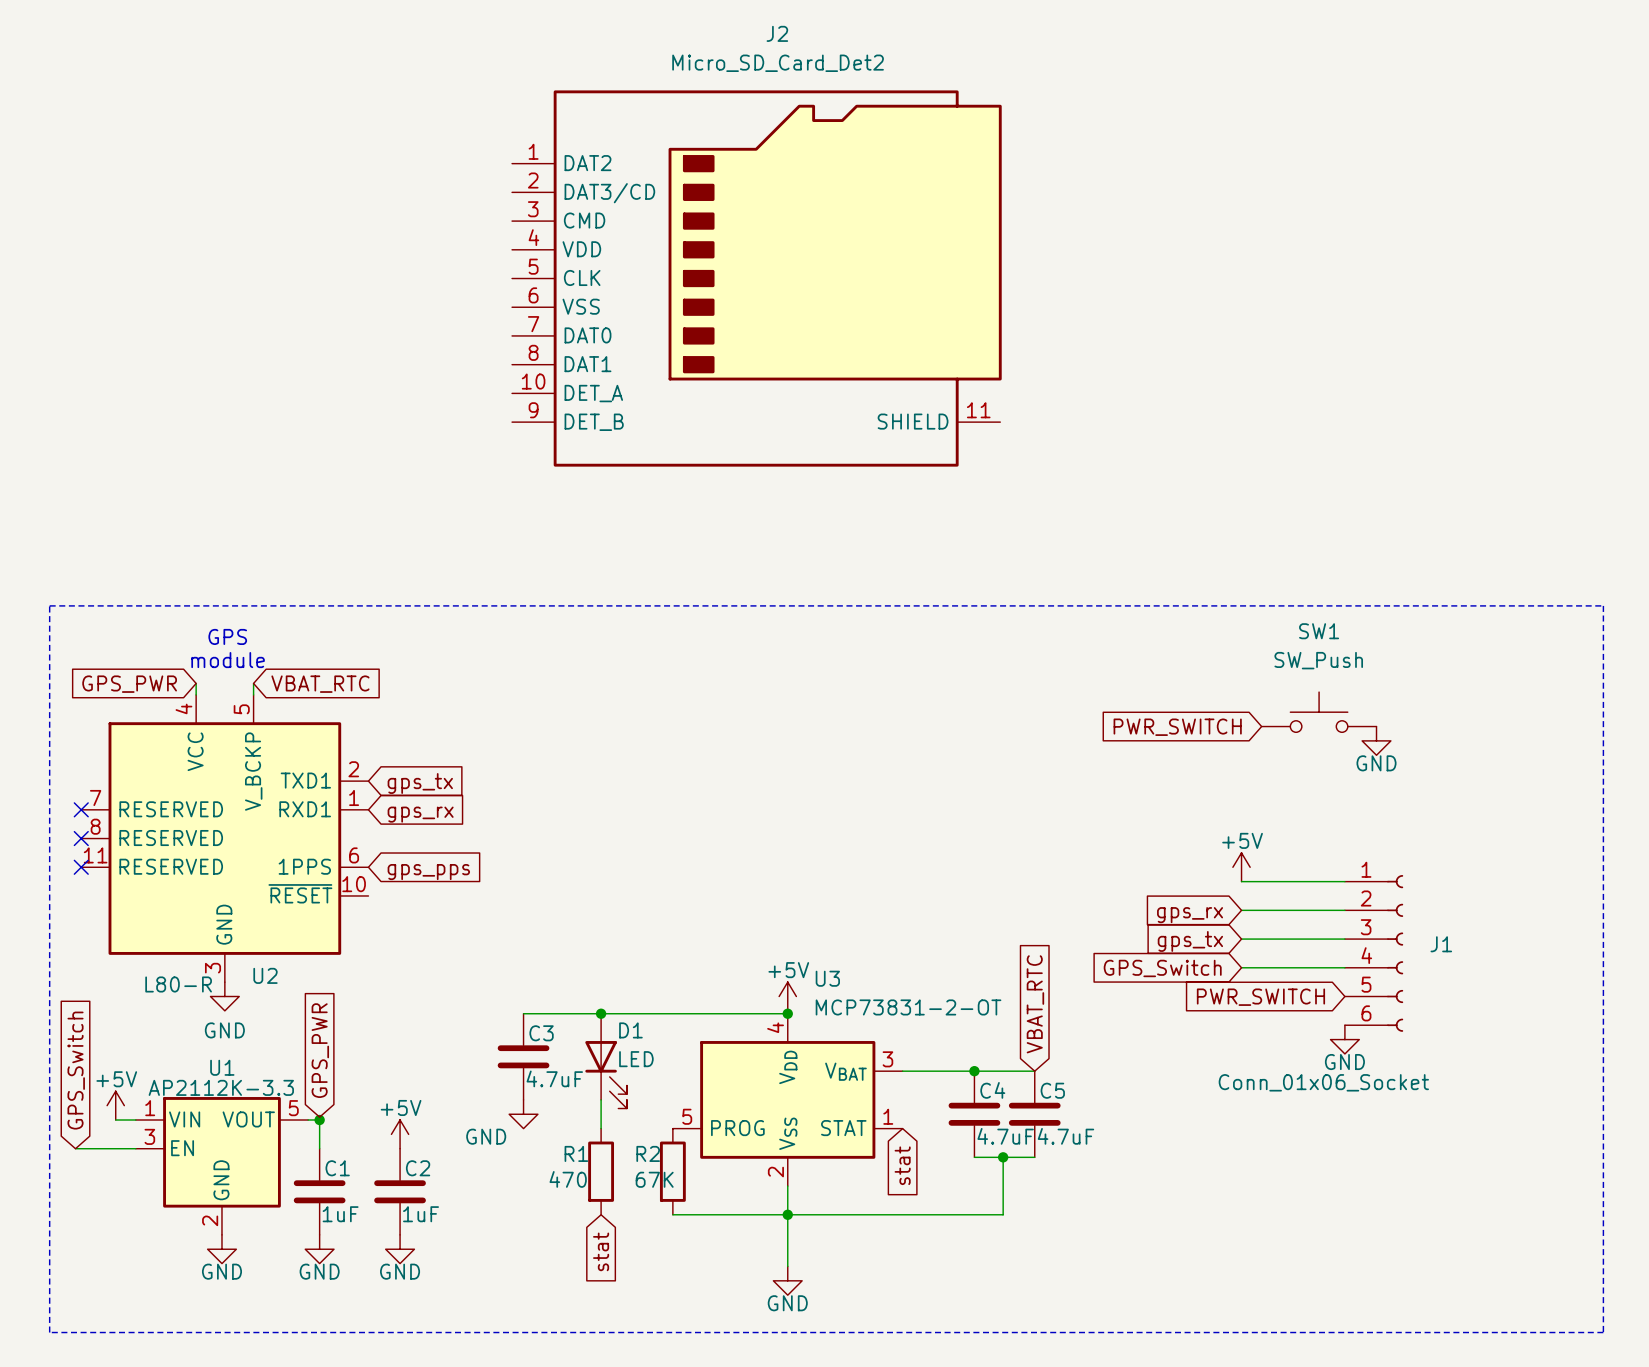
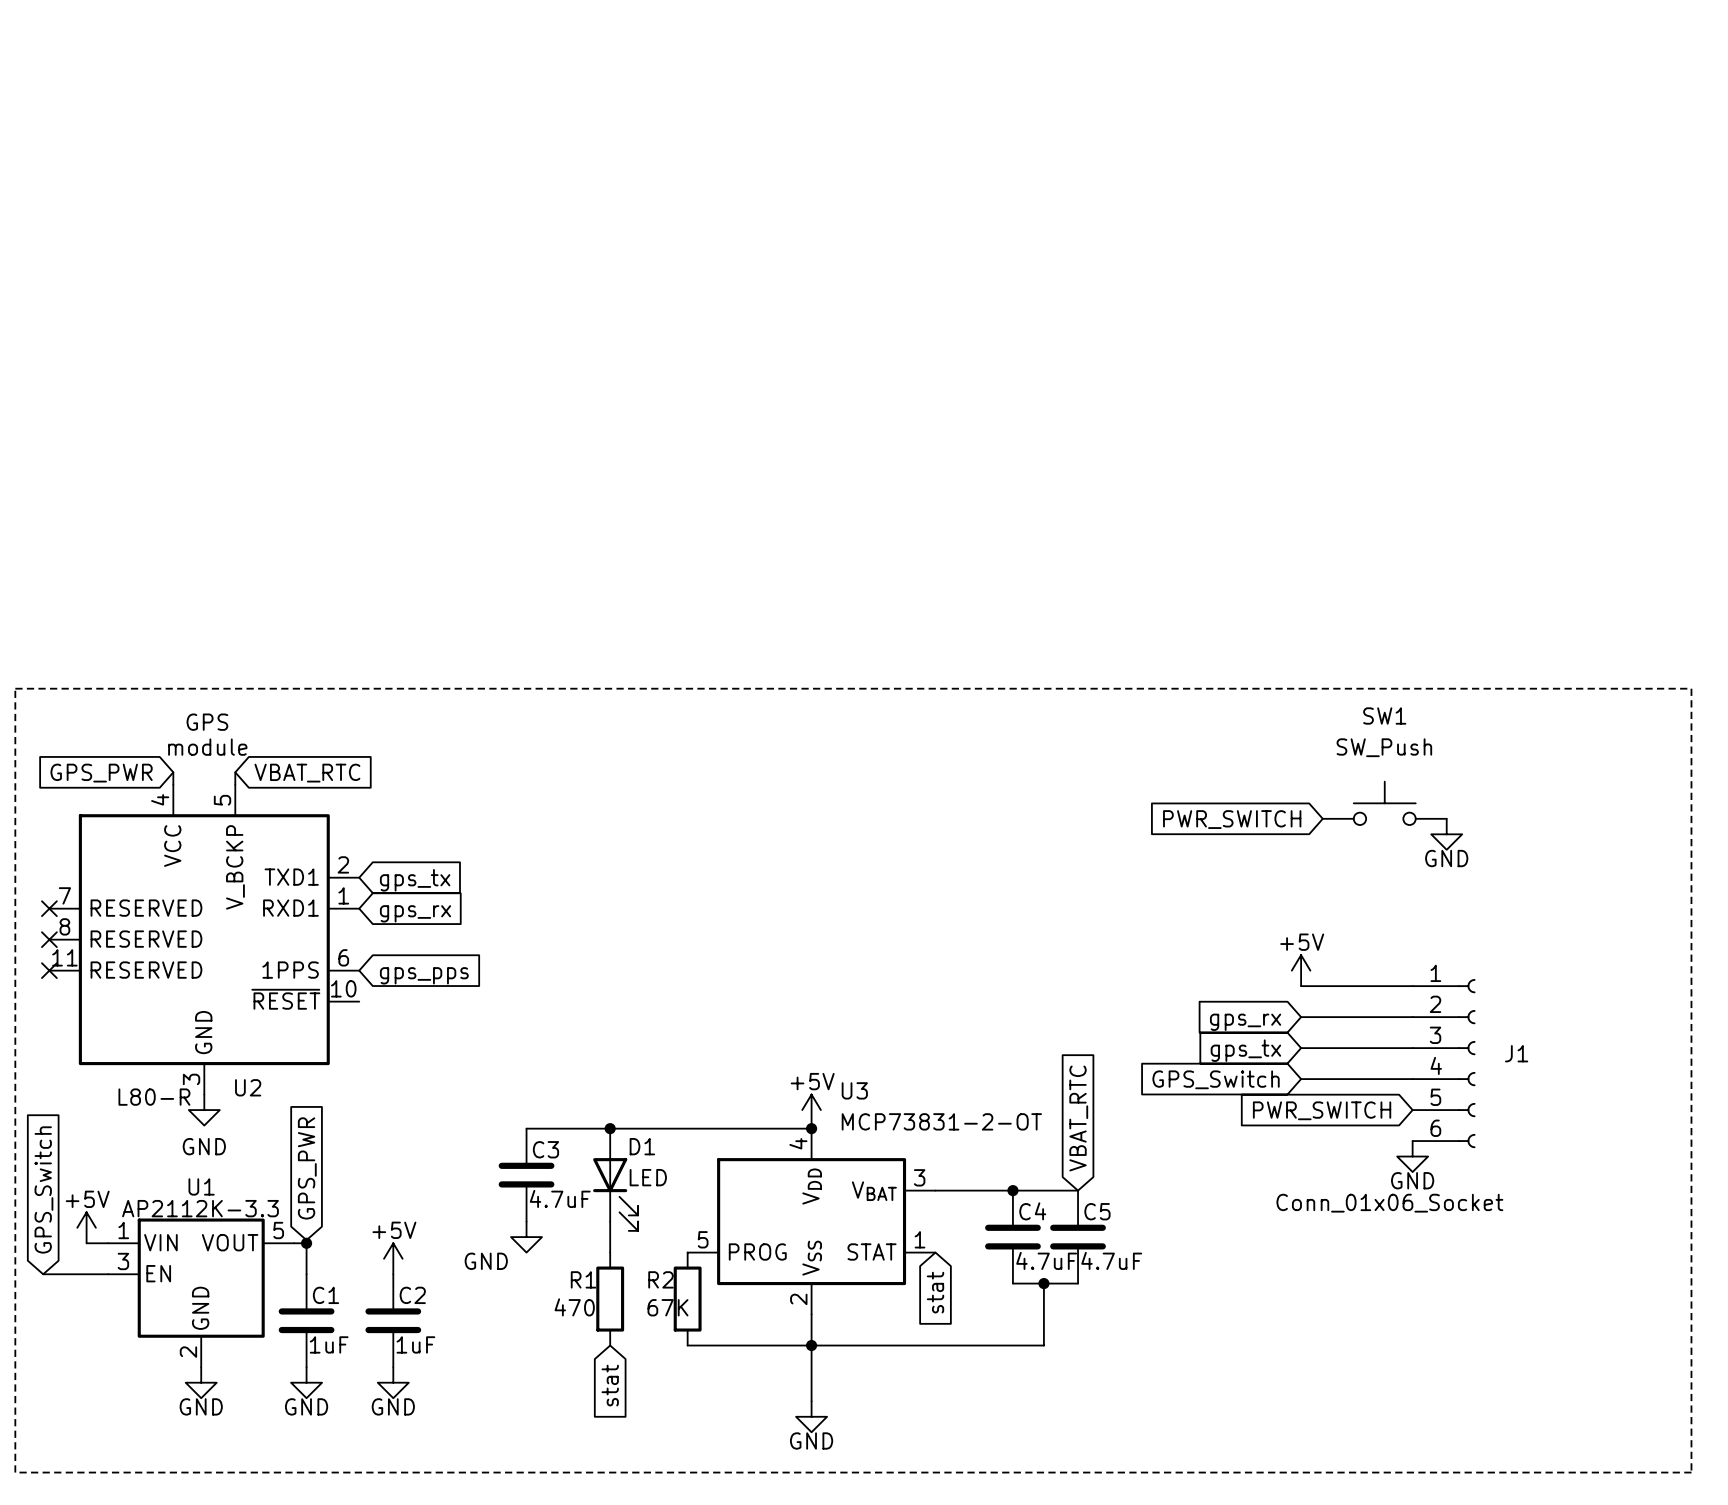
J2: Micro_SD_Card_Det2 (756, 278) -> none

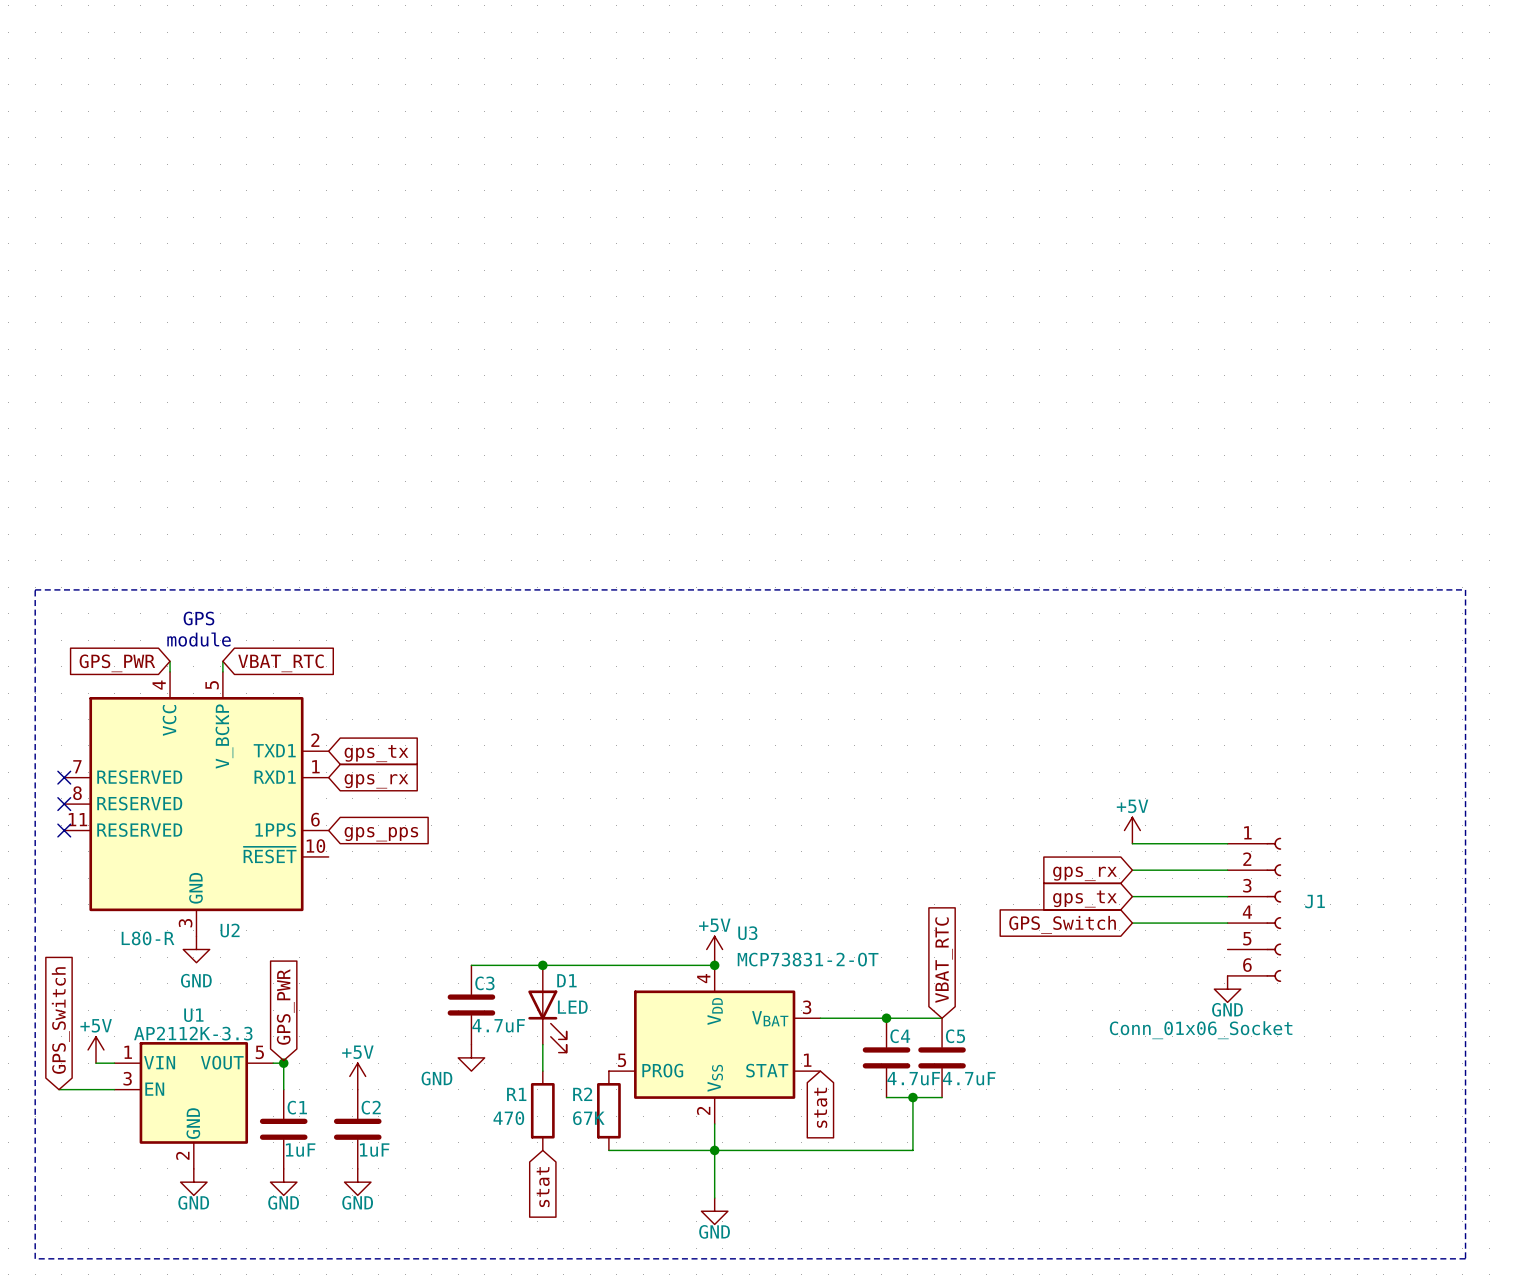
SW1: SW_Push (1384, 803) -> none
global label: PWR_SWITCH (1232, 819) -> none
power symbol: GND (1446, 834) -> none
global label: PWR_SWITCH (1322, 1110) -> none

